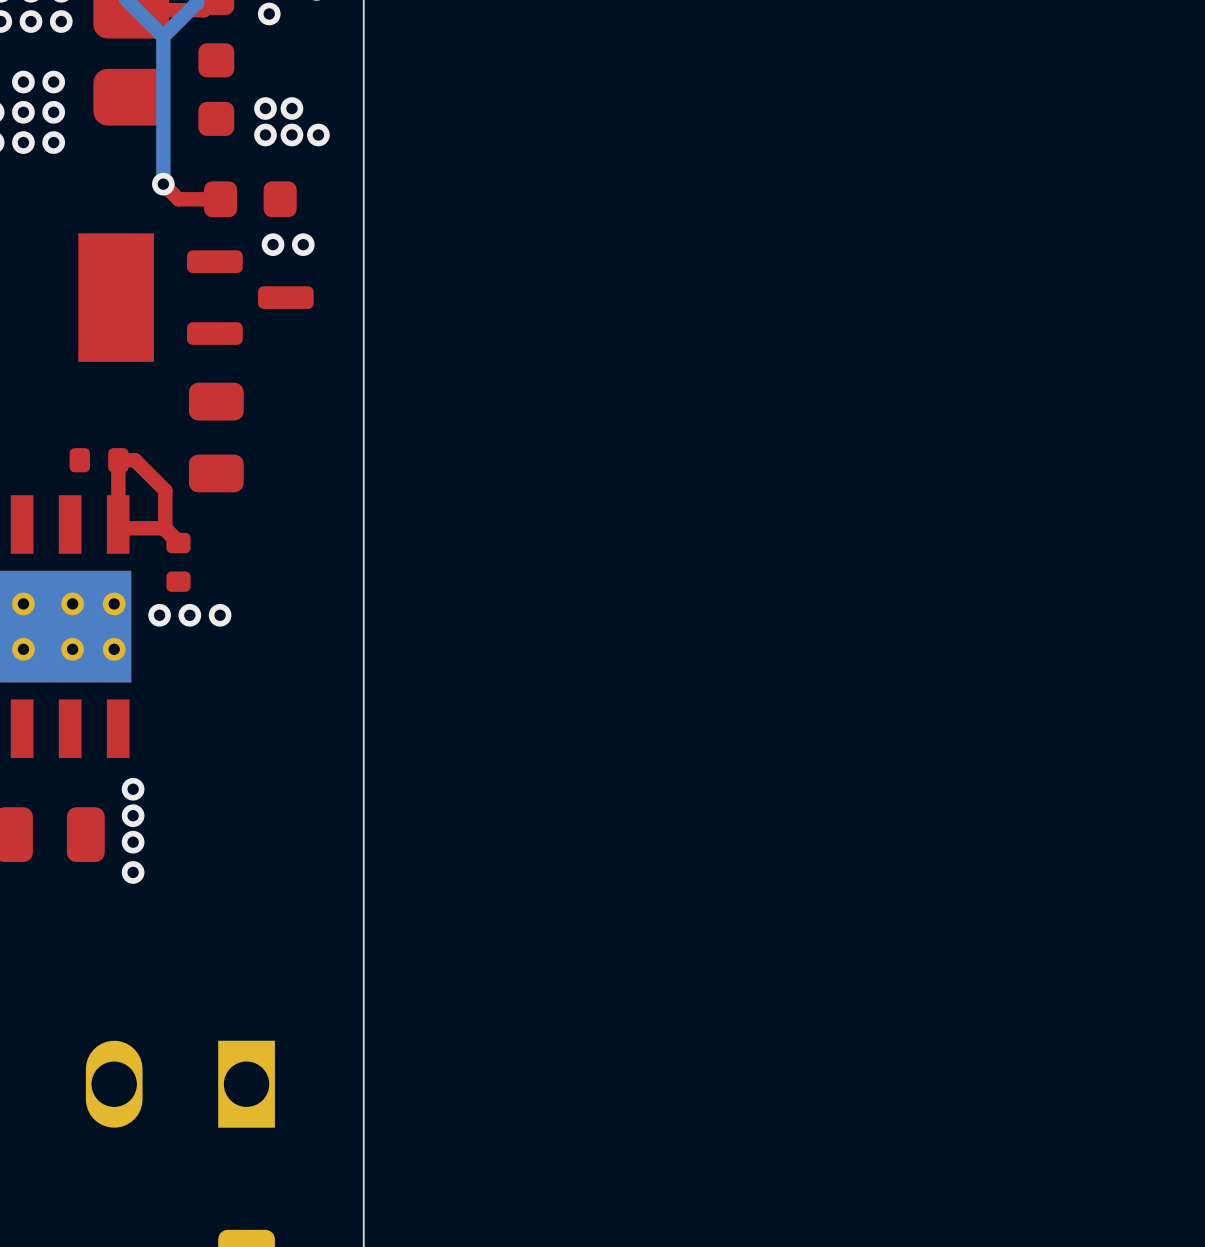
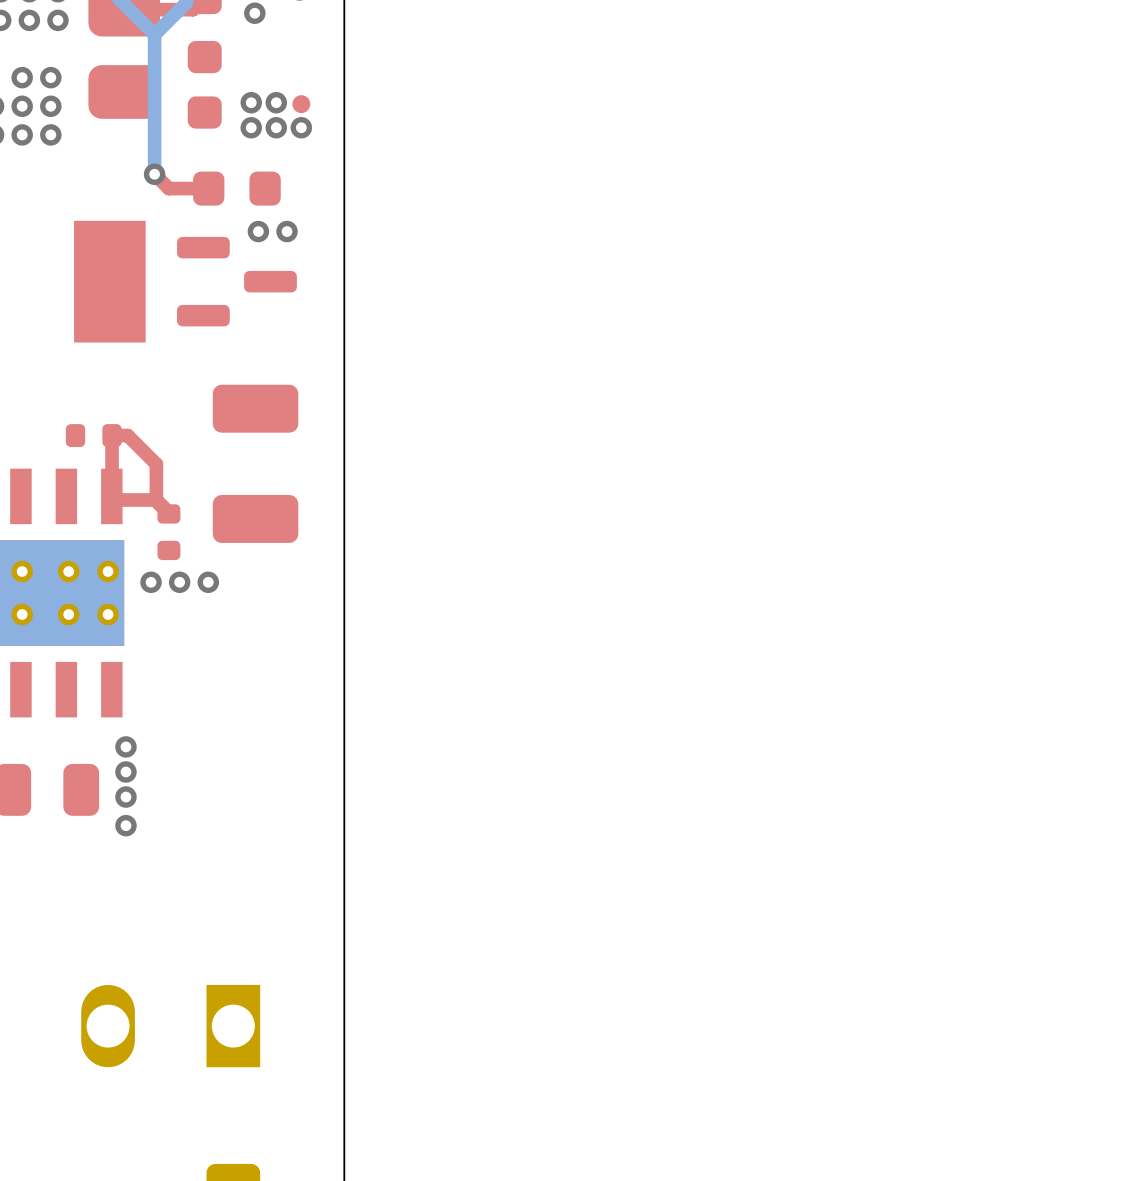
part: none -> (301, 104)
part: (216, 437) -> none
part: none -> (255, 463)

